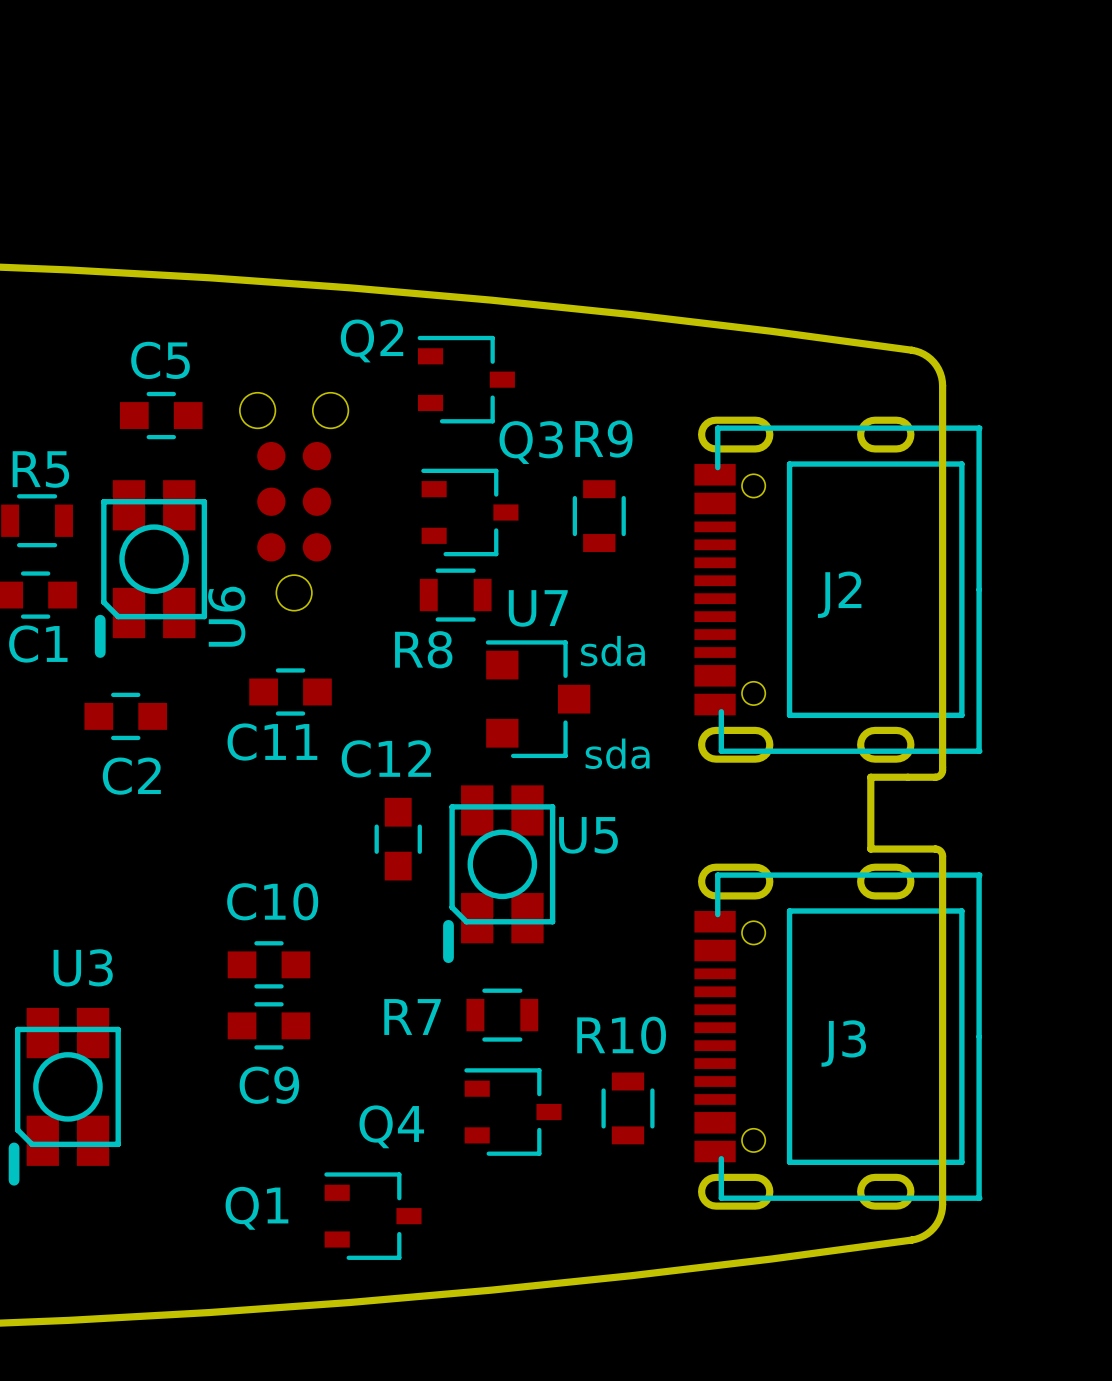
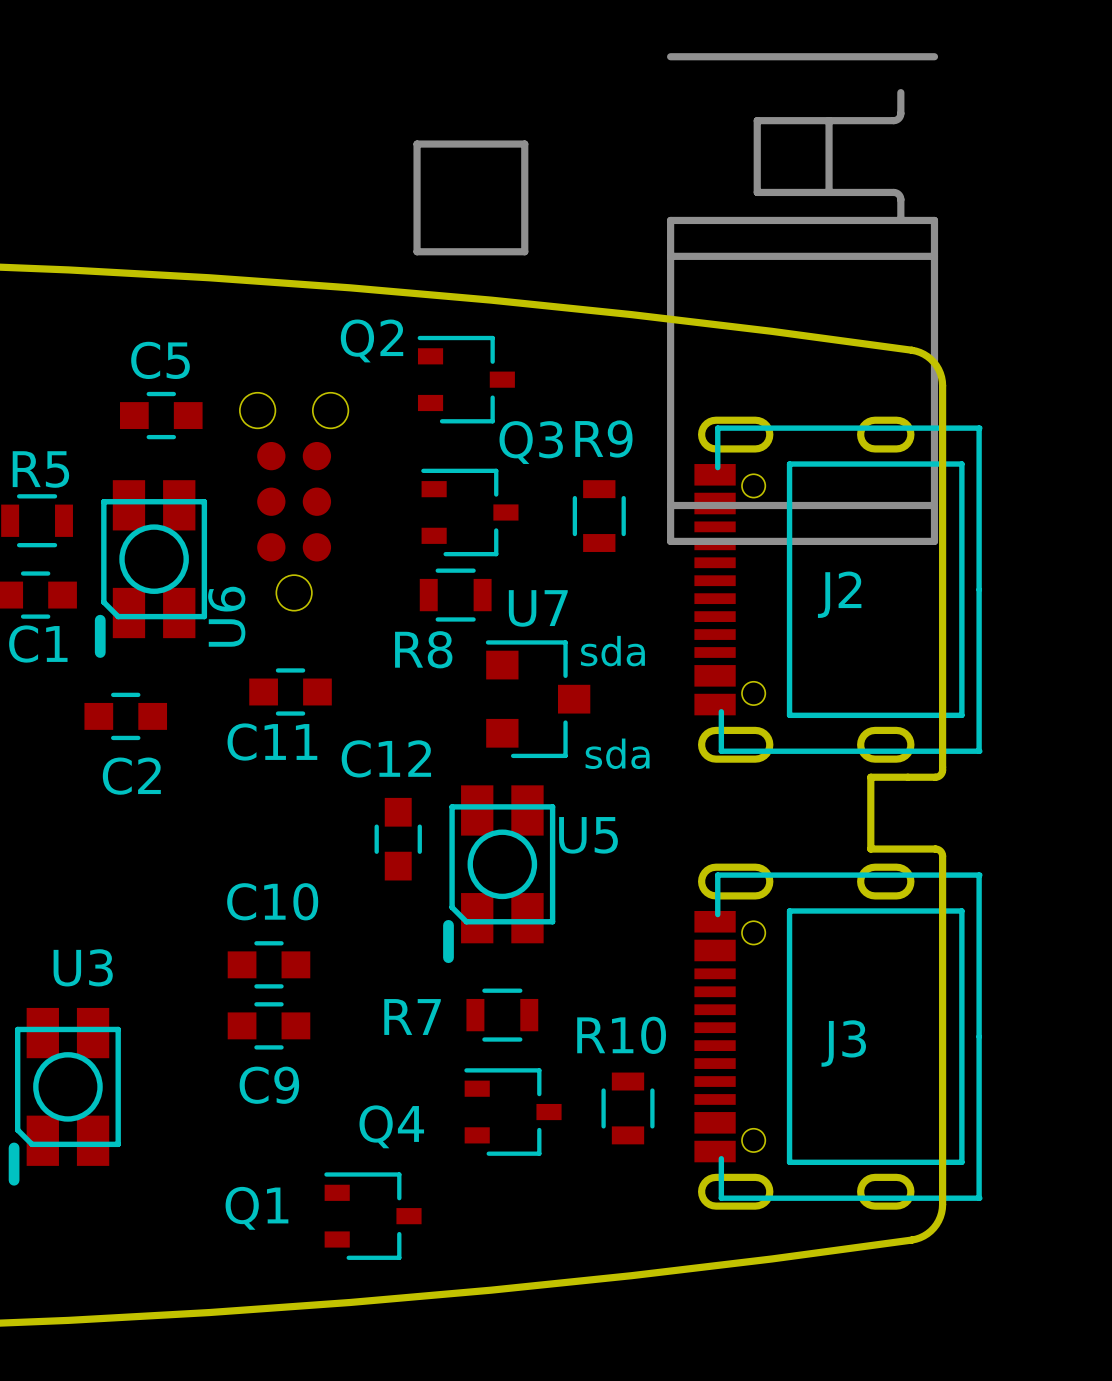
line: none -> (670, 56) (934, 56)
line: none -> (900, 92) (900, 115) (894, 120) (757, 120) (757, 192) (894, 192) (900, 197) (900, 220)
line: none -> (829, 120) (829, 192)
line: none -> (417, 144) (524, 144) (524, 251) (417, 251) (417, 144)
line: none -> (670, 220) (934, 220) (934, 541) (670, 541) (670, 220)
line: none -> (670, 256) (934, 256)
line: none -> (670, 505) (934, 505)

